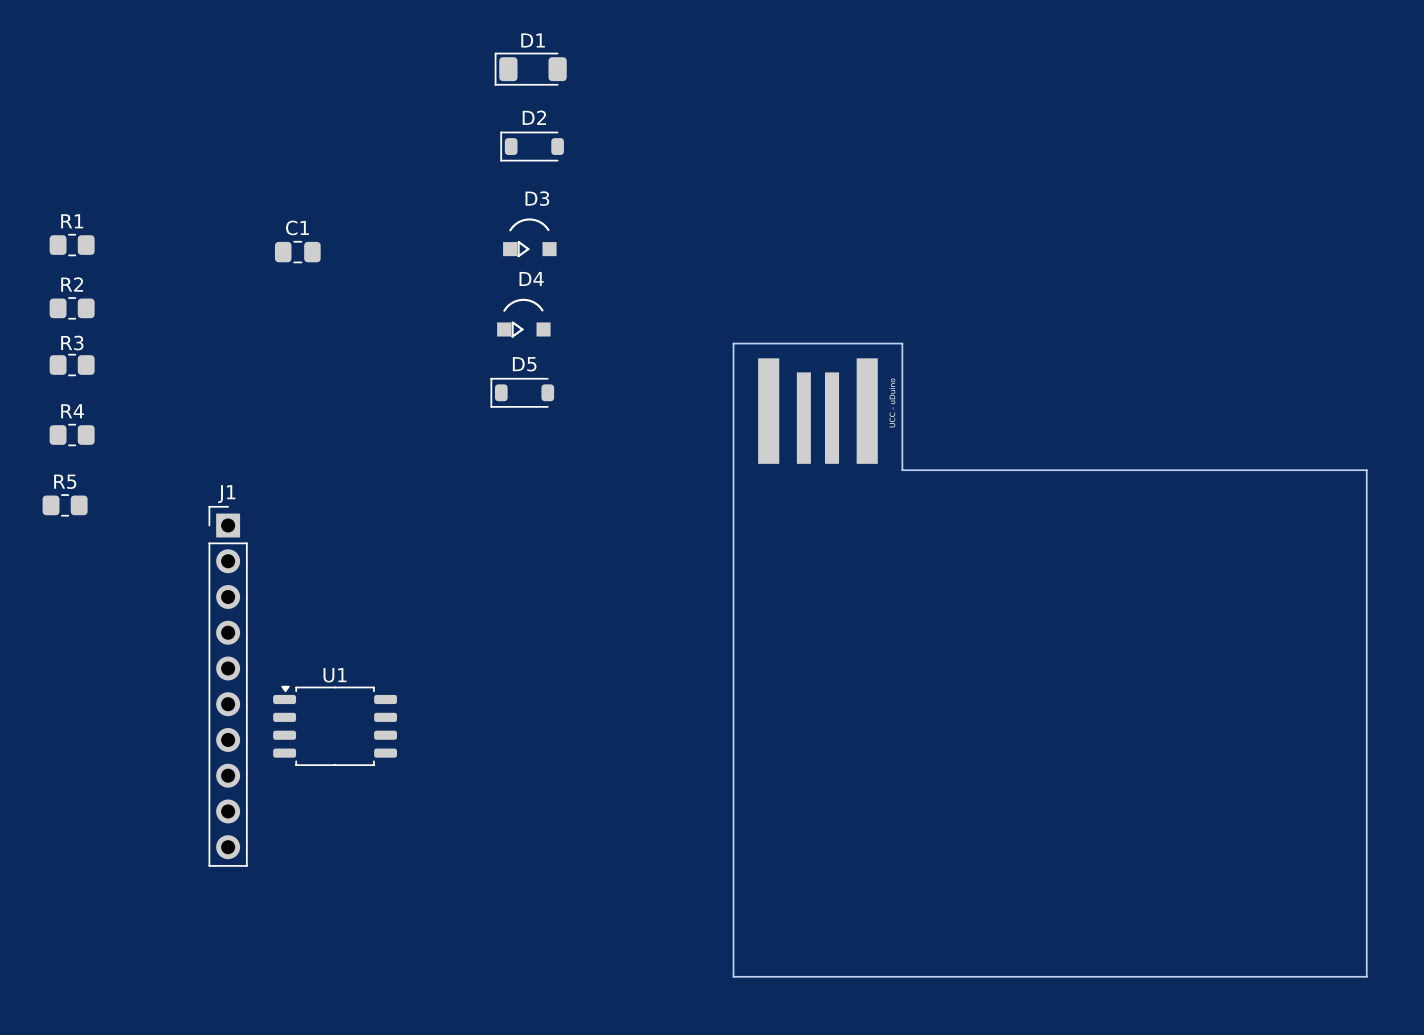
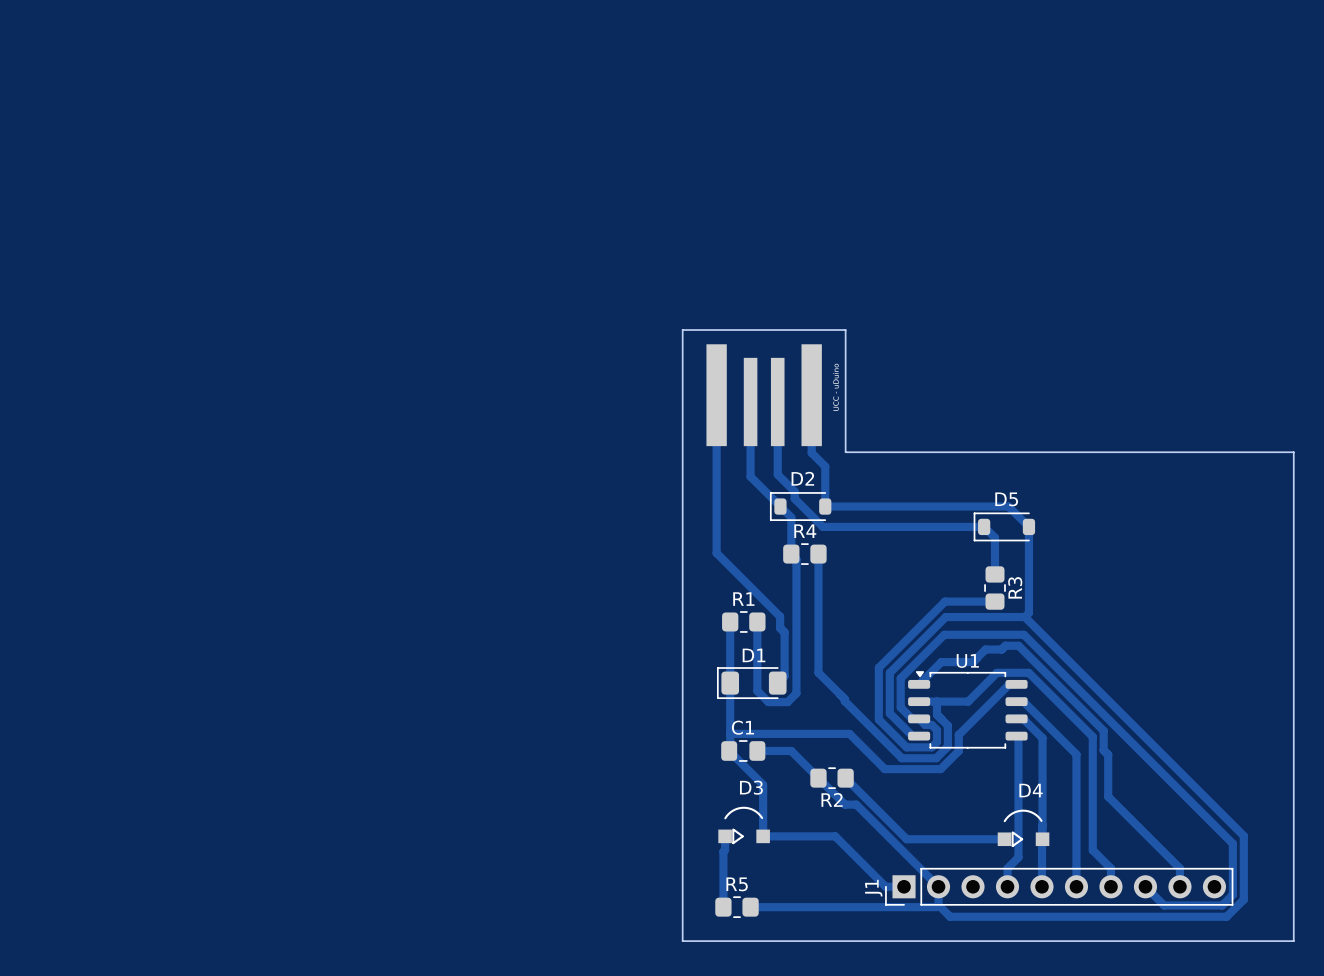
D1 position: (530, 69) -> (751, 683)
D2 position: (532, 146) -> (800, 506)
D3 position: (529, 237) -> (744, 825)
R1 position: (72, 245) -> (743, 621)
C1 position: (297, 252) -> (743, 750)
R2 name position: R2 (72, 284) -> R2 (832, 799)
R2 position: (72, 308) -> (832, 778)
D4 position: (523, 318) -> (1023, 828)
R3 rotation: 0° (72, 365) -> 90° clockwise (995, 588)
R3 position: (72, 365) -> (995, 588)
D5 position: (522, 392) -> (1004, 526)
track: none -> (716, 395) (716, 553) (780, 616) (780, 628) (784, 632) (784, 676) (777, 683)
track: none -> (811, 395) (811, 452) (825, 466) (825, 506) (1008, 506) (1028, 526) (1028, 612) (1024, 617)
track: none -> (750, 401) (750, 476) (791, 517) (791, 554) (796, 559) (796, 693) (787, 702) (768, 702) (757, 690) (757, 621)
track: none -> (777, 401) (777, 474) (794, 491) (794, 498) (822, 526) (984, 526) (995, 537) (995, 574)
R4 position: (72, 435) -> (804, 554)
R5 position: (65, 505) -> (736, 907)
track: none -> (818, 554) (818, 672) (901, 758) (936, 758) (947, 746) (947, 725) (936, 714) (936, 701)
track: none -> (995, 601) (945, 601) (878, 667) (878, 719) (906, 747) (931, 747) (936, 742) (936, 730) (931, 724) (925, 724) (919, 718) (912, 718) (900, 707) (900, 678) (944, 634) (1023, 634) (1232, 843) (1232, 894) (1222, 905) (1164, 905) (1145, 886)
track: none -> (1024, 617) (1243, 835) (1243, 899) (1226, 916) (950, 916) (938, 905)
track: none -> (1024, 617) (945, 617) (889, 672) (889, 713) (912, 736) (919, 736)
track: none -> (730, 621) (729, 750) (763, 784) (763, 836) (835, 836) (885, 886) (904, 886)
J1 rotation: 0° (228, 686) -> 90° counterclockwise (1059, 886)
J1 position: (228, 686) -> (1059, 886)
track: none -> (919, 684) (941, 662) (972, 662) (985, 649) (1001, 649) (1005, 645) (1018, 645) (1103, 730) (1103, 750) (1108, 754) (1108, 796) (1179, 868) (1179, 886)
track: none -> (1016, 684) (1009, 684) (958, 734) (958, 751) (940, 769) (884, 769) (849, 733) (730, 733)
U1 position: (335, 725) -> (967, 709)
track: none -> (919, 701) (968, 701) (996, 672) (1028, 672) (1092, 736) (1092, 850) (1110, 868) (1110, 886)
track: none -> (1016, 701) (1023, 701) (1076, 754) (1076, 886)
track: none -> (1016, 718) (1023, 718) (1042, 738) (1042, 839)
track: none -> (1016, 736) (1018, 738) (1018, 857) (1007, 868) (1007, 886)
track: none -> (757, 750) (791, 750) (844, 804) (856, 804) (938, 886) (938, 905)
track: none -> (845, 778) (906, 839) (1004, 839)
track: none -> (1042, 825) (1041, 886)
track: none -> (725, 836) (723, 907)
track: none -> (938, 905) (936, 907) (750, 907)

